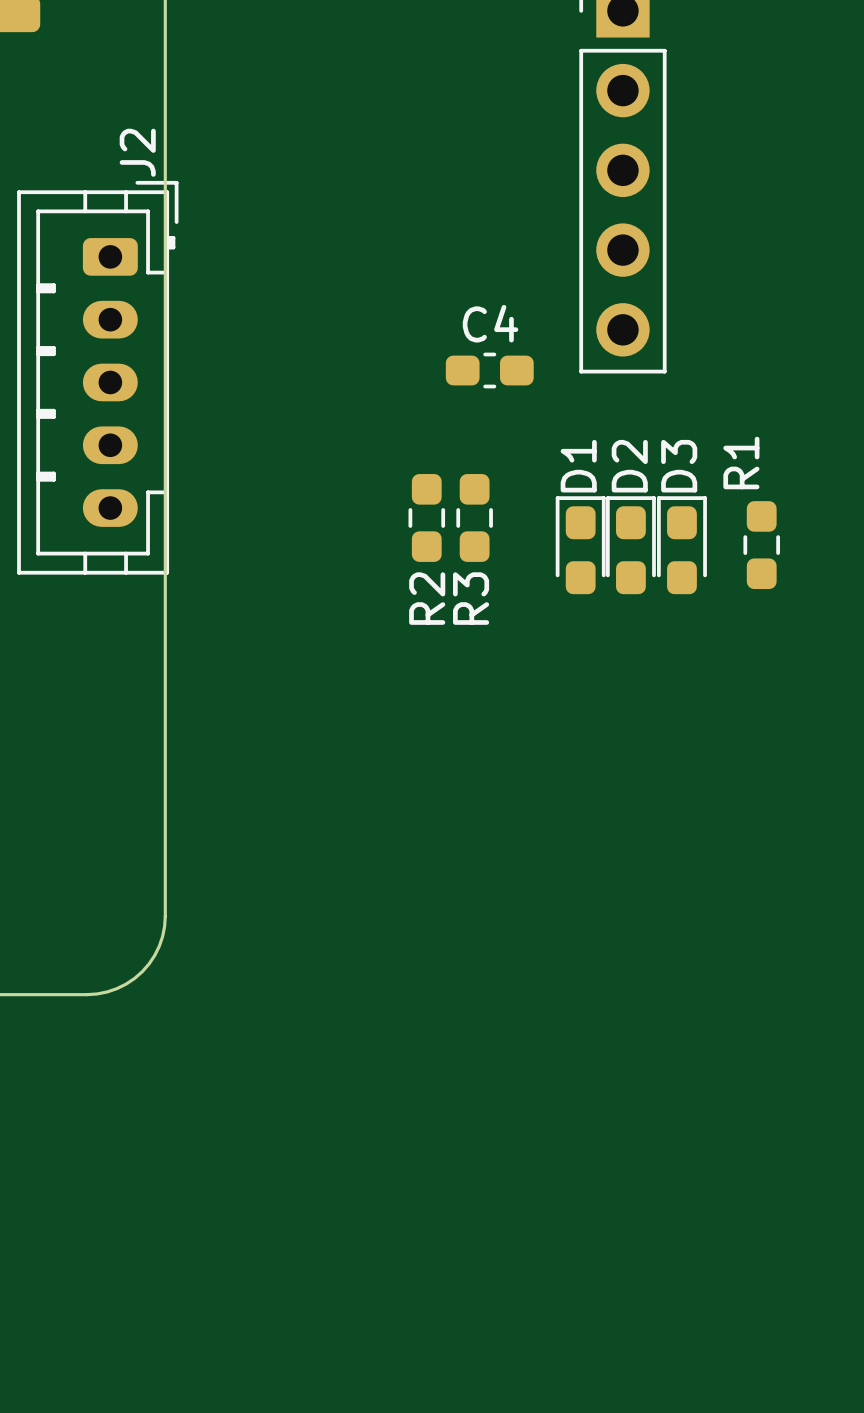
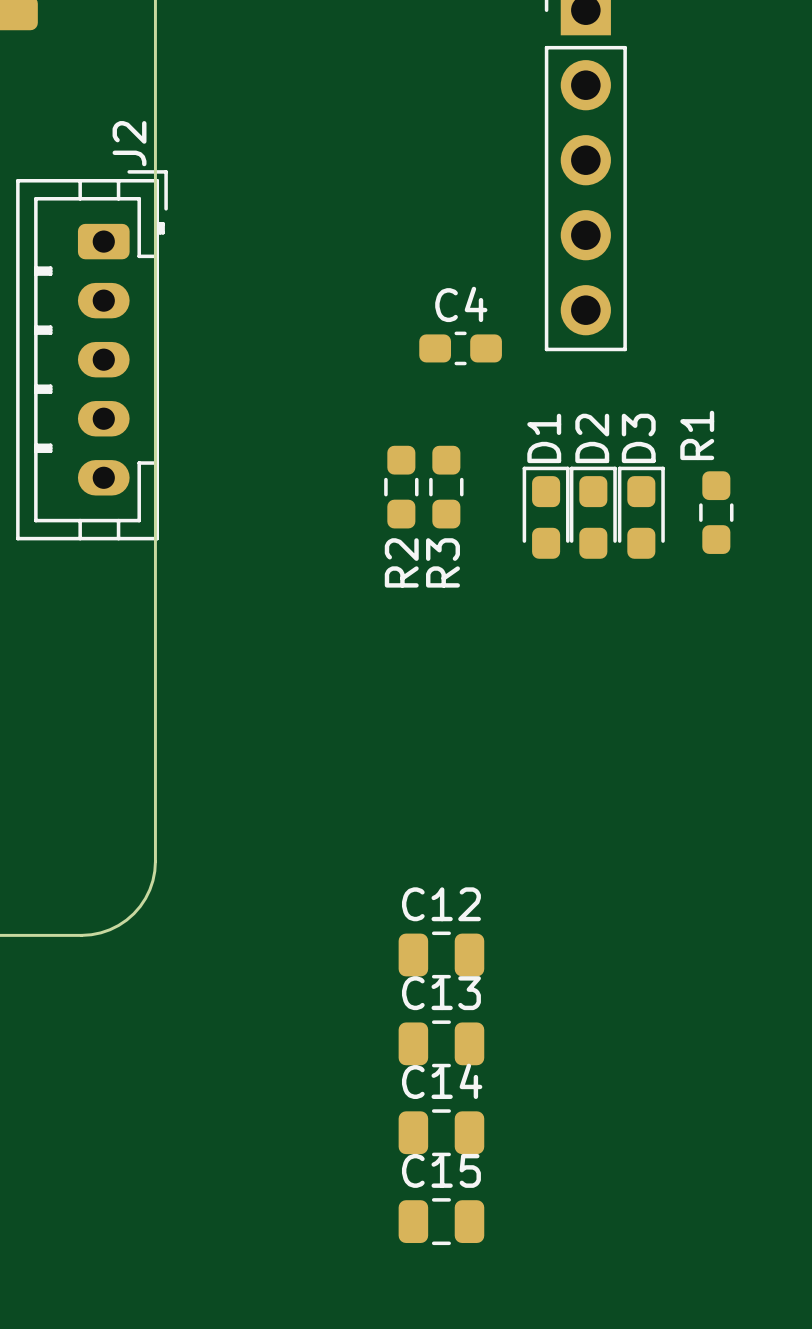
C12: none -> (441, 954)
C13: none -> (441, 1043)
C14: none -> (441, 1132)
C15: none -> (441, 1221)

